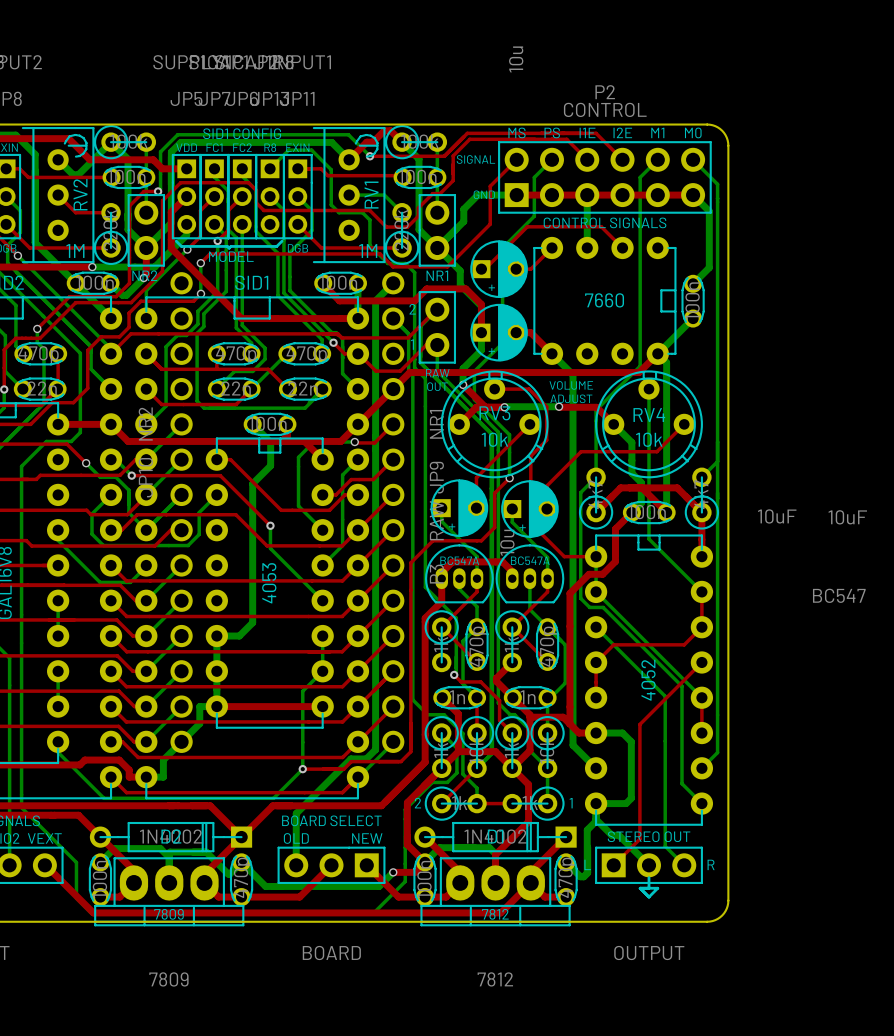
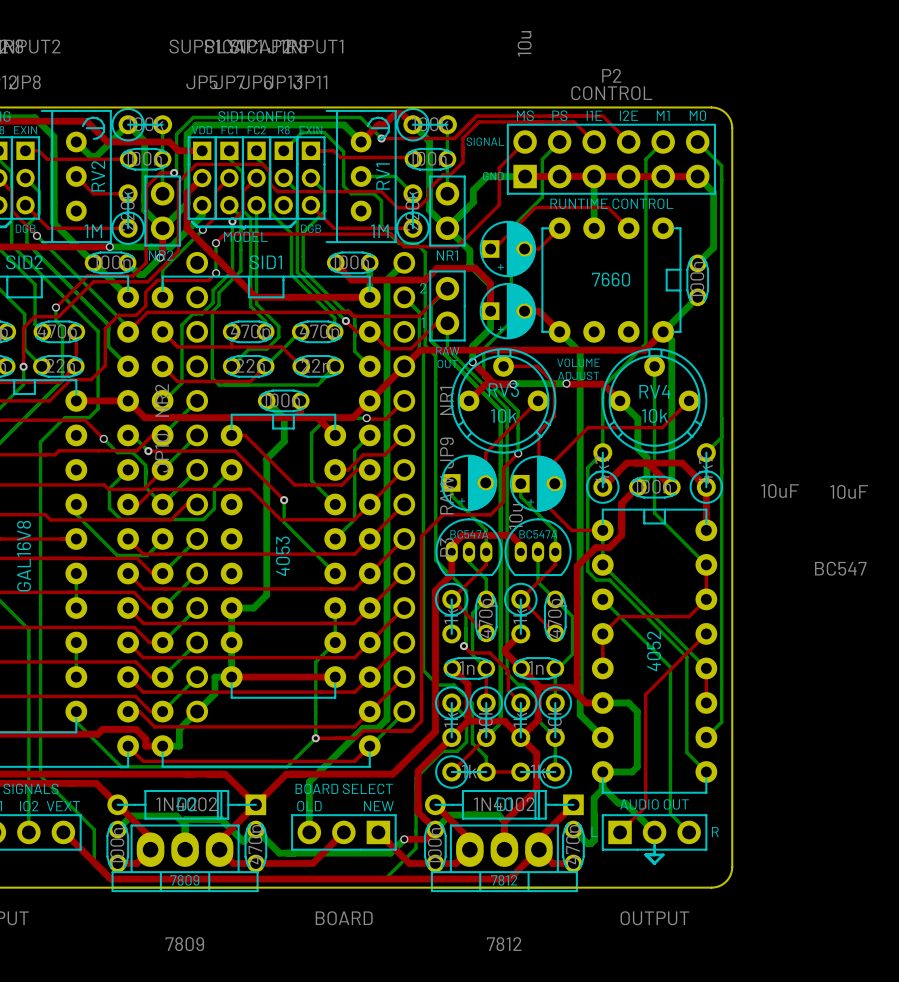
text: CONTROL SIGNALS (605, 222) -> RUNTIME CONTROL (611, 203)
text: 2 (417, 803) -> none
text: 1 (571, 803) -> none
text: STEREO OUT (649, 836) -> AUDIO OUT (654, 804)

